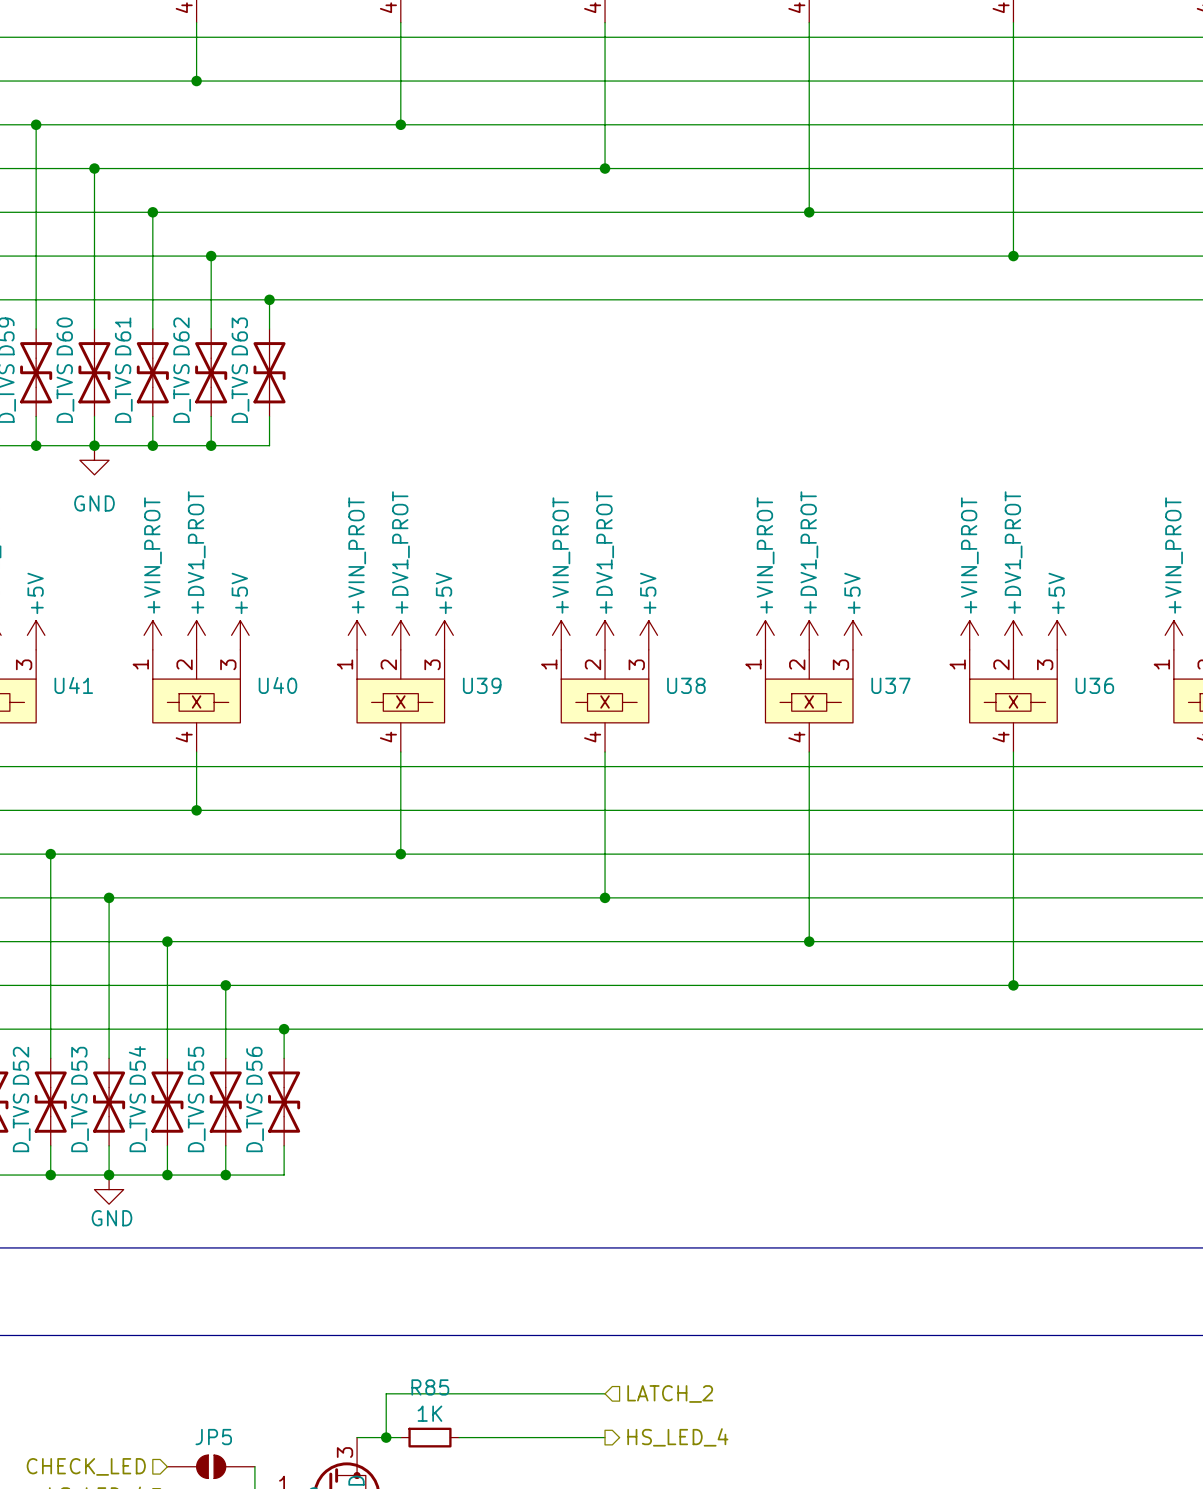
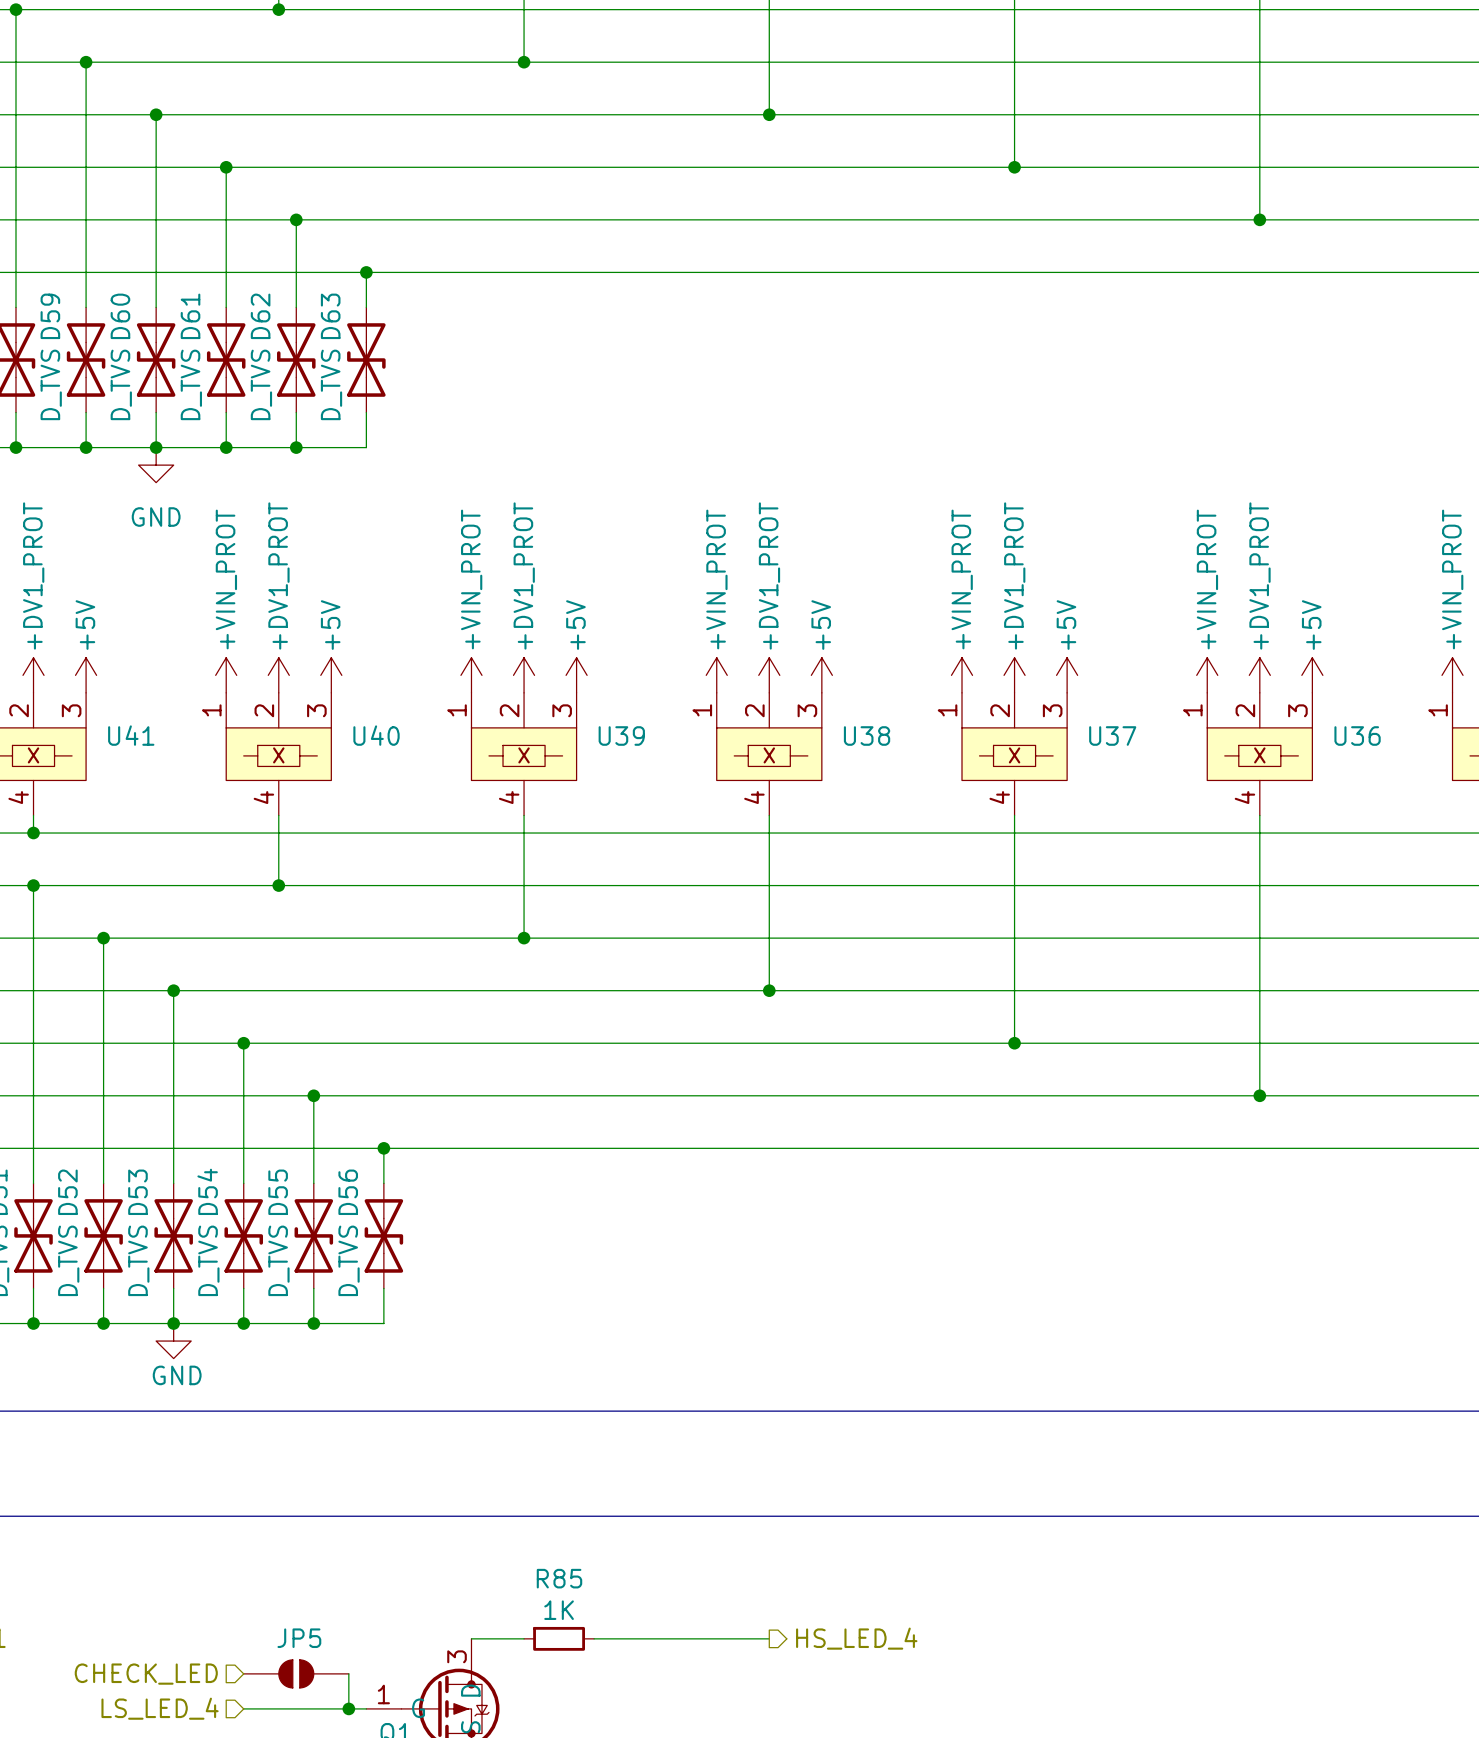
wire: (605, 1393) (386, 1393) (386, 1437) -> none
hierarchical label: LATCH_2 (670, 1393) -> none
junction: (386, 1437) -> none

